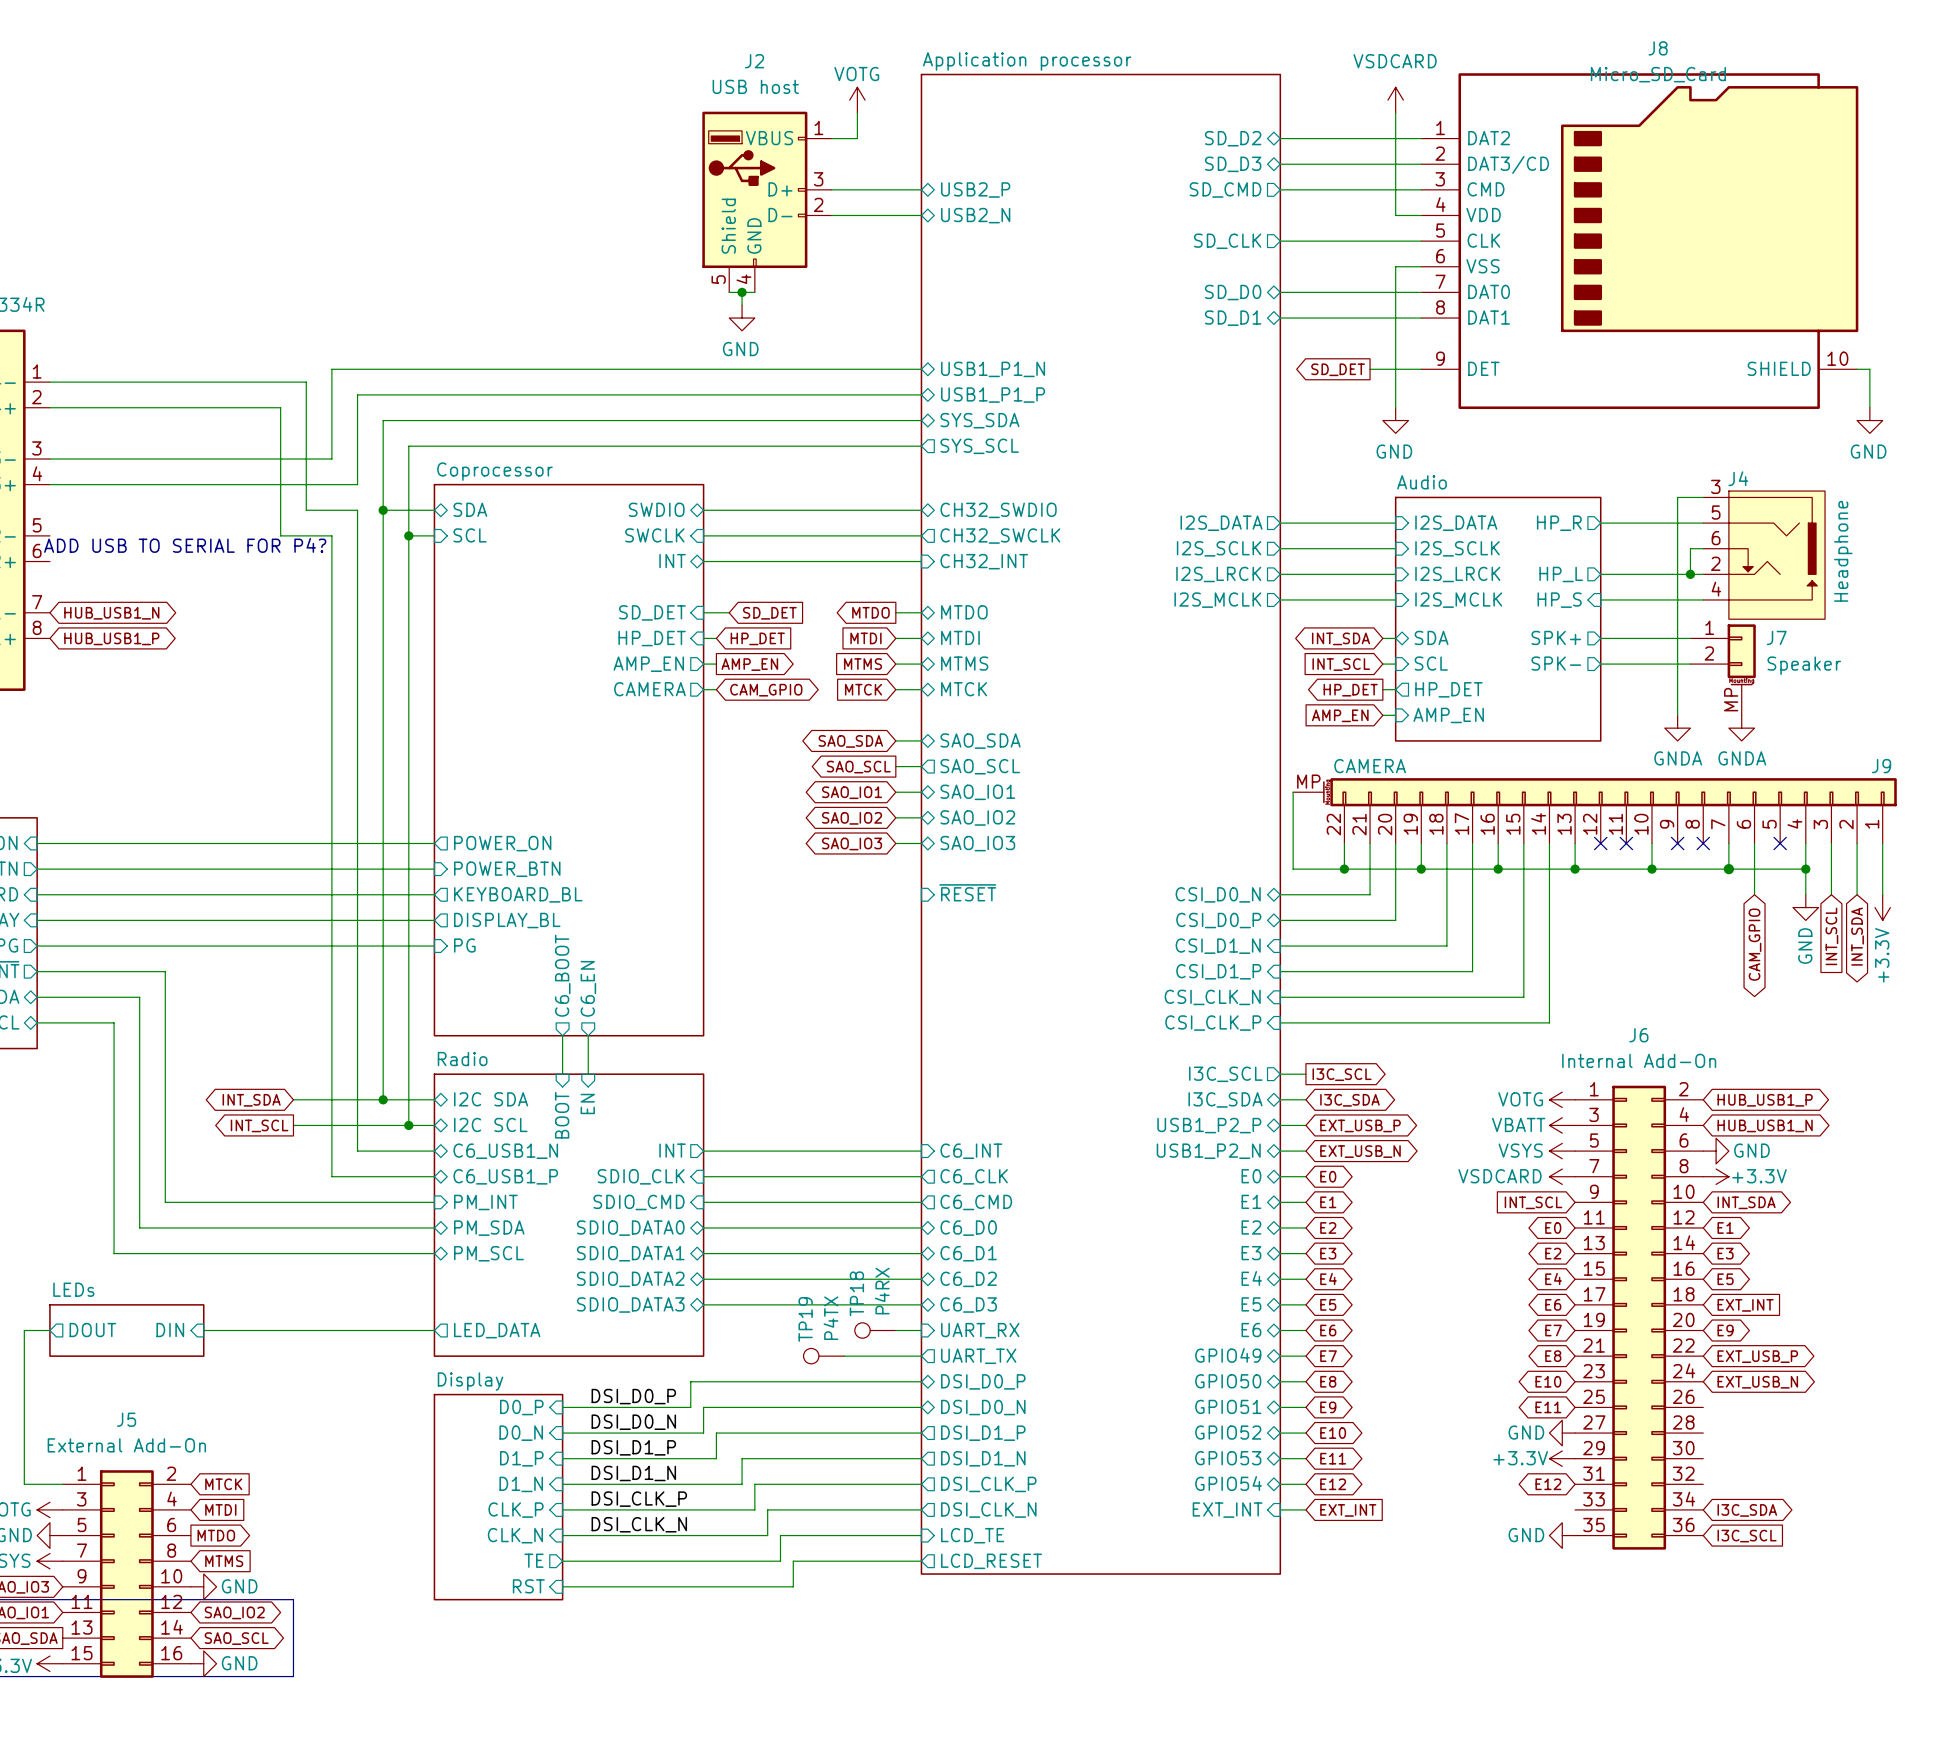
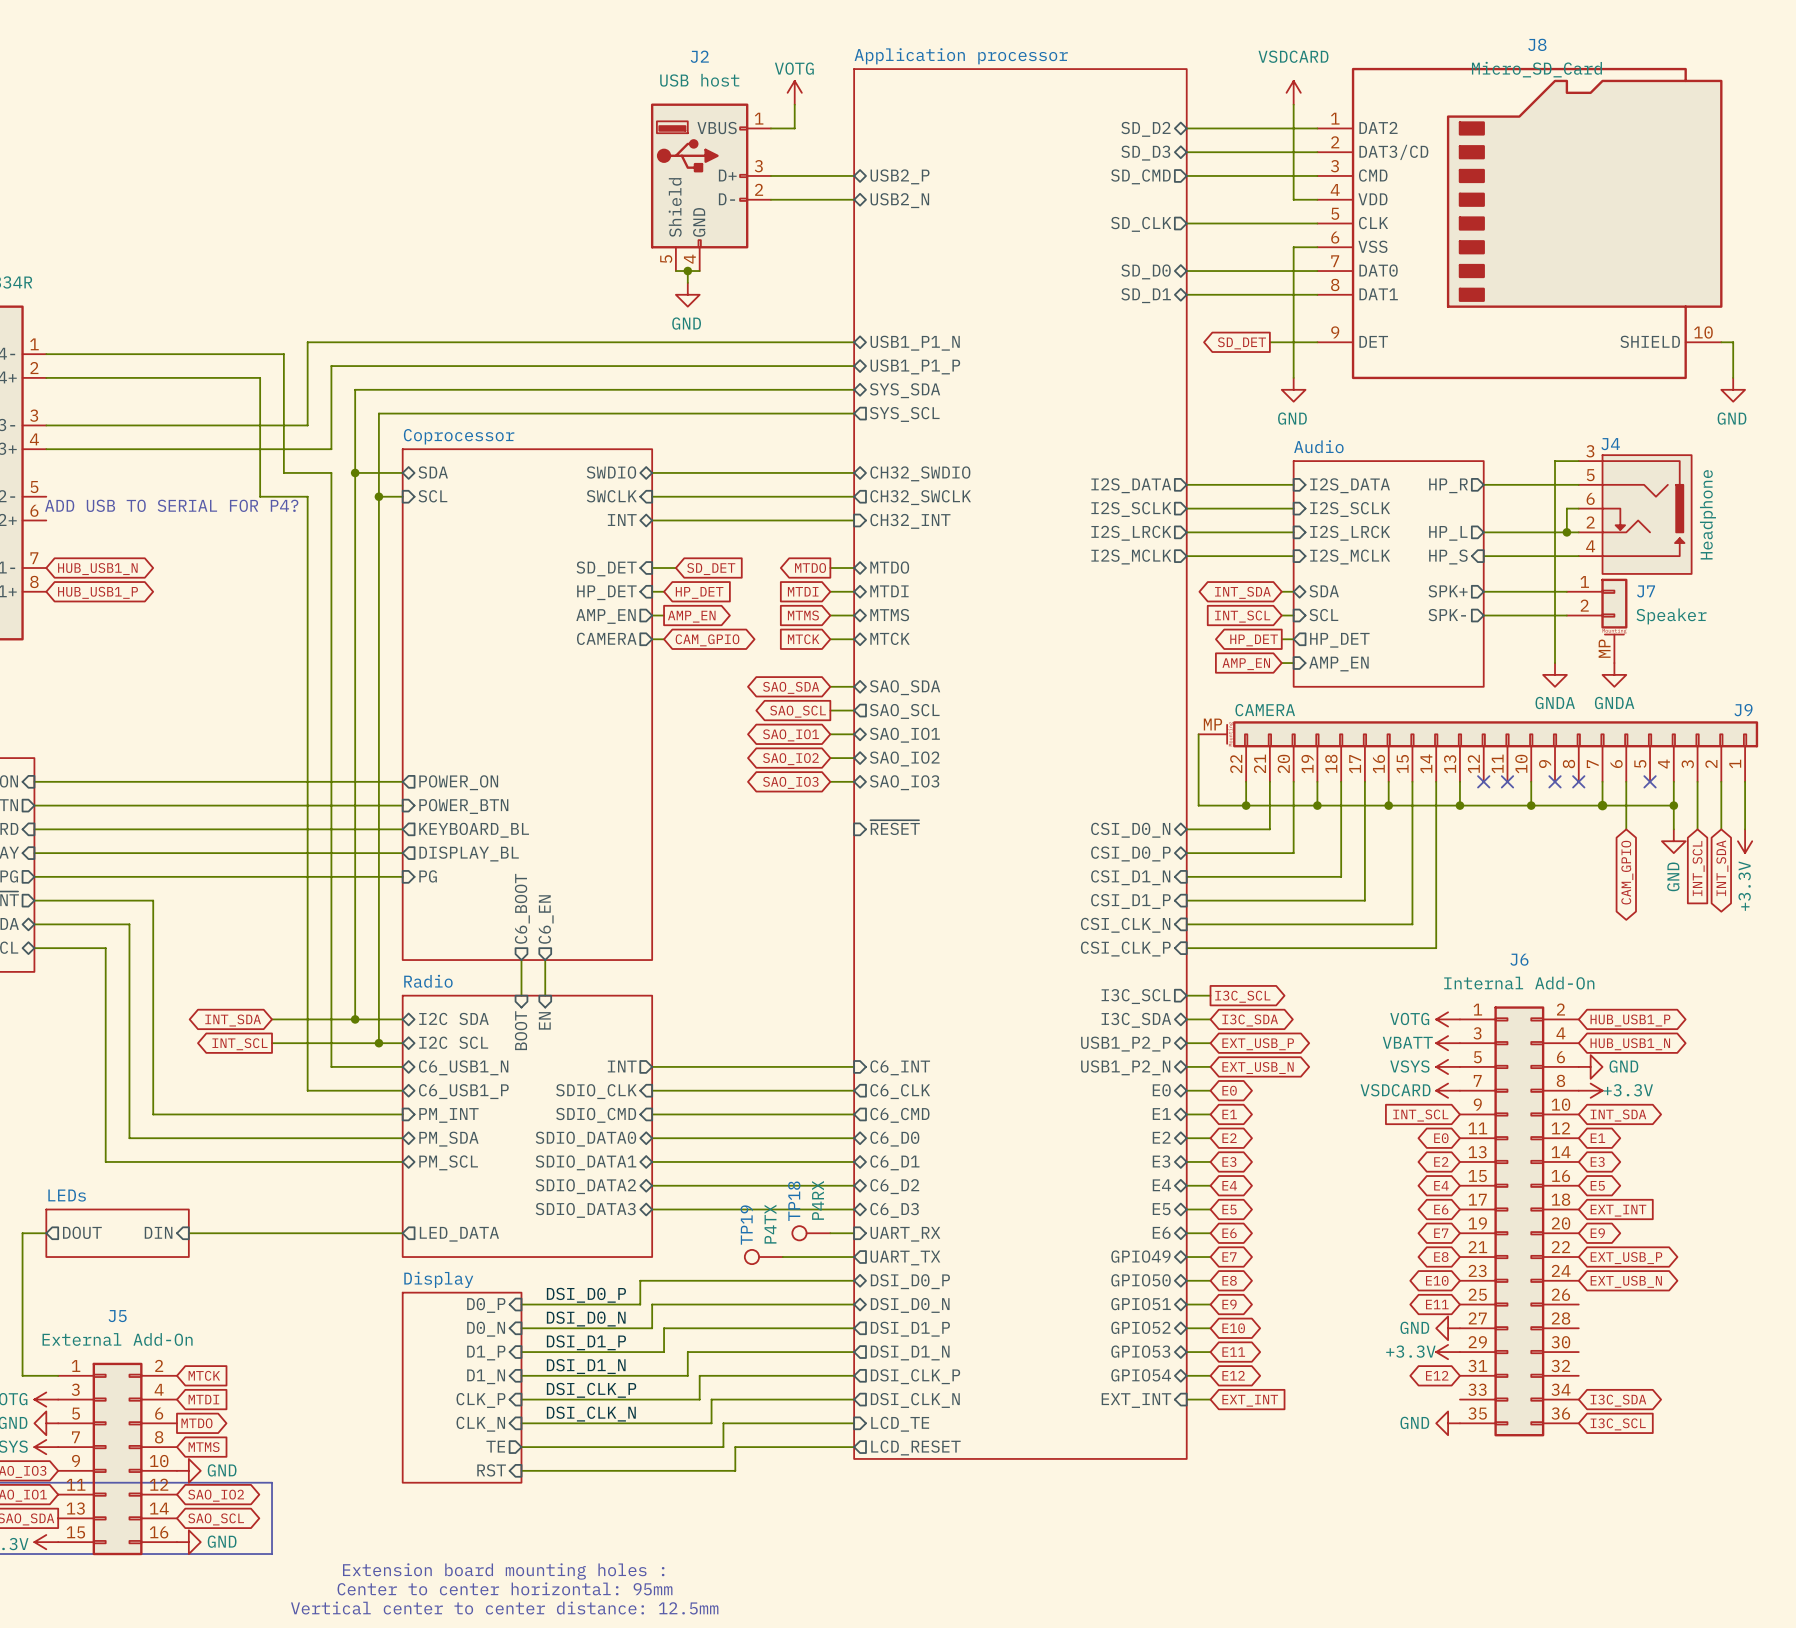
text: none -> Extension board mounting holes : (503, 1571)
text: none -> Center to center horizontal: 95mm (504, 1588)
text: none -> Vertical center to center distance: 12.5mm (504, 1608)

